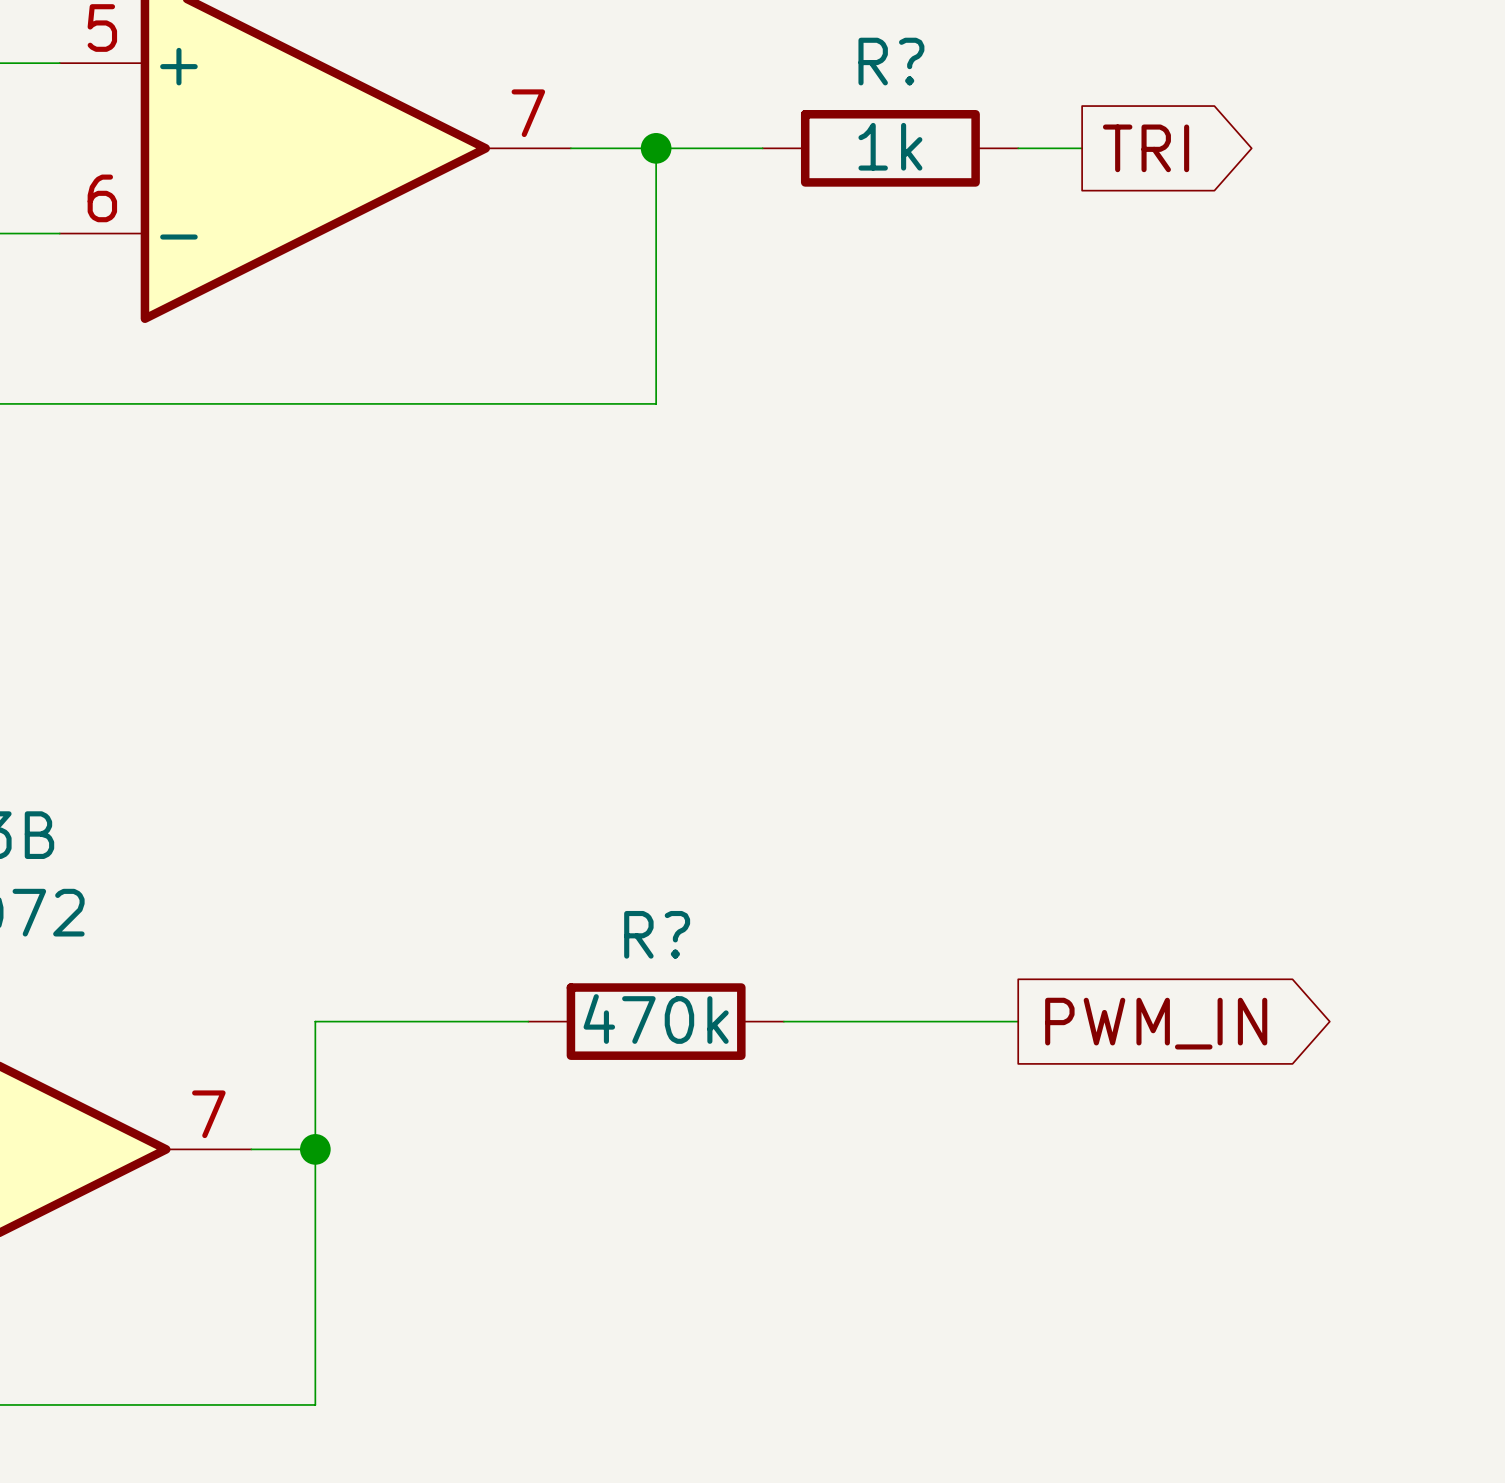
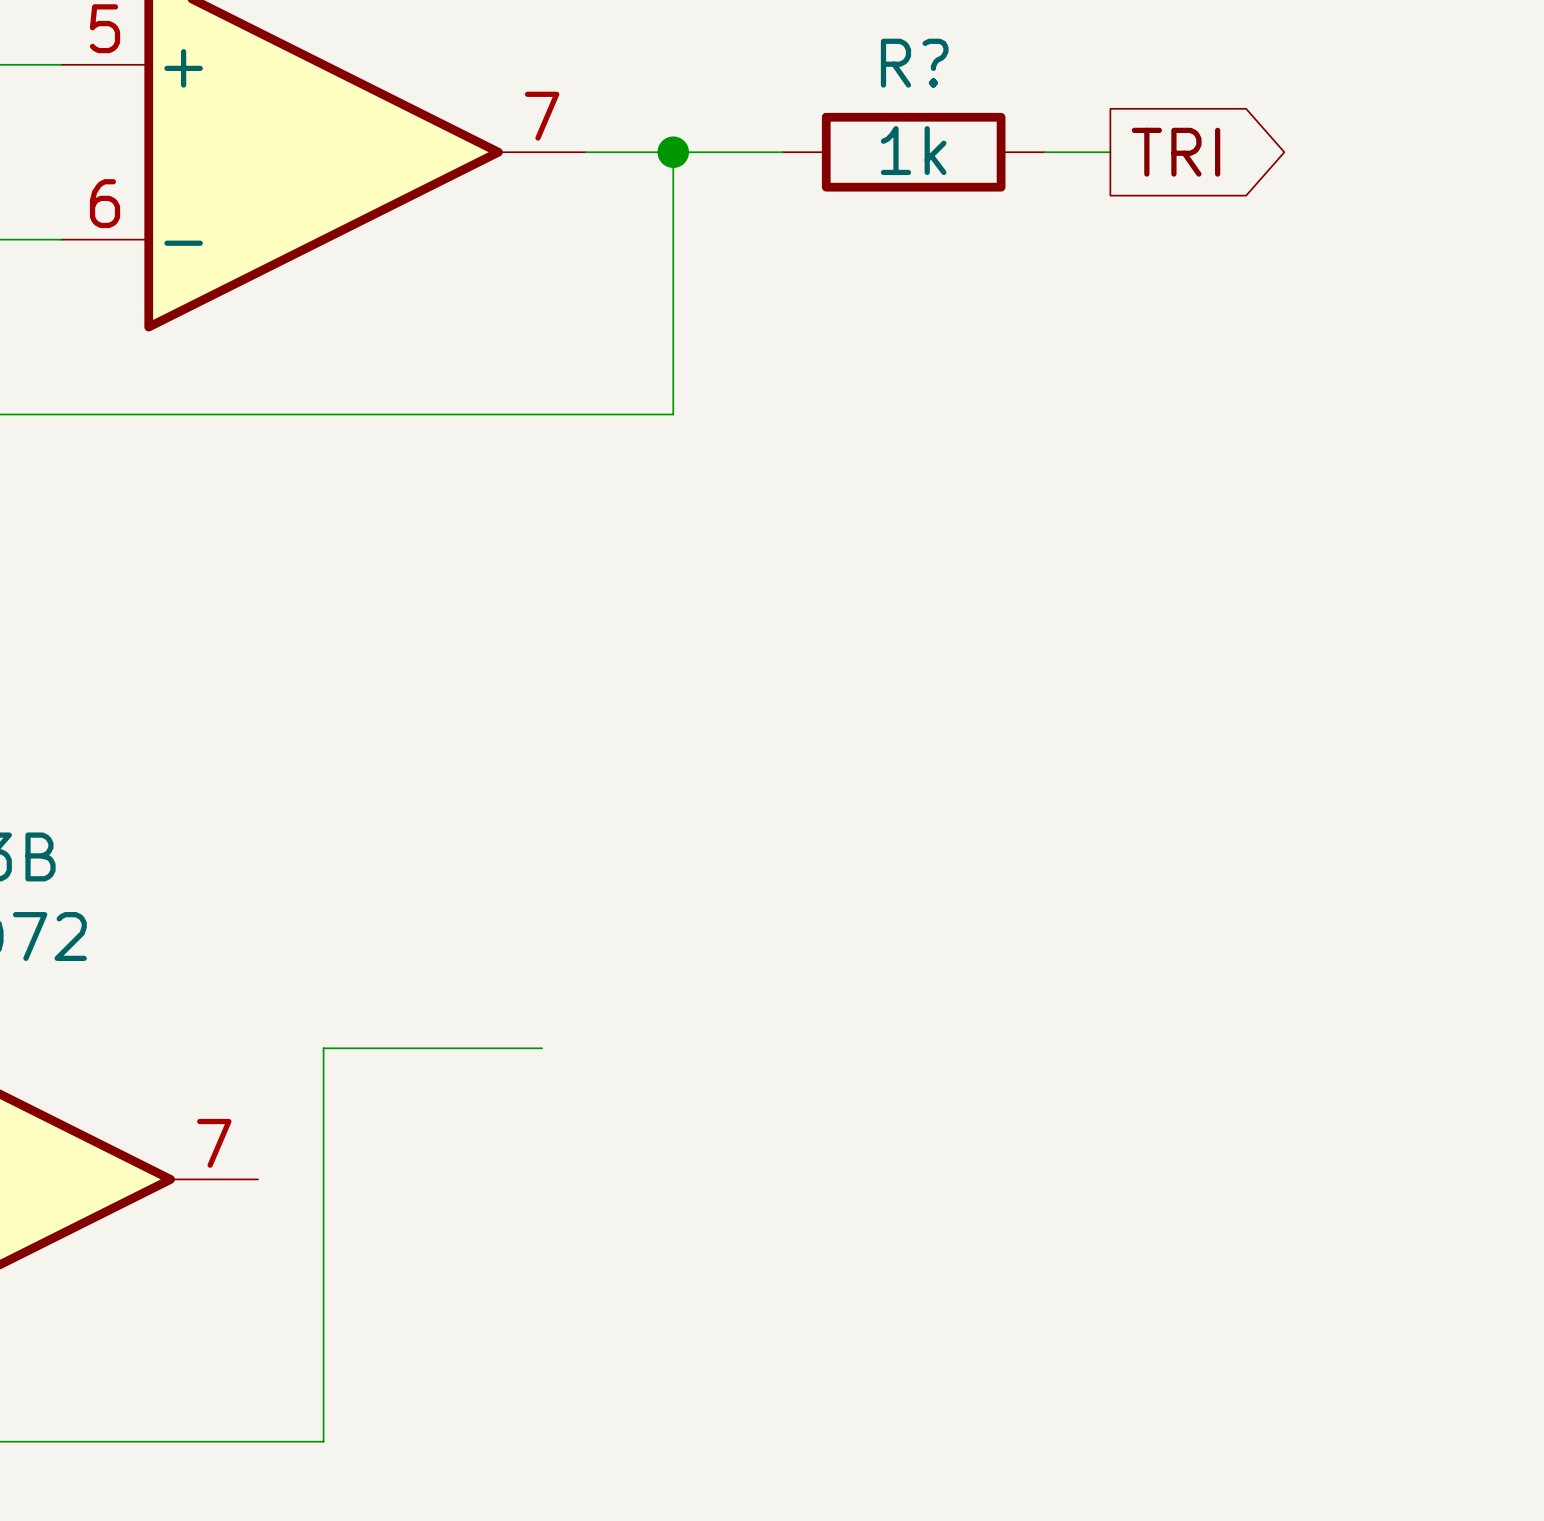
R?: 470k (656, 1021) -> none
wire: (783, 1021) (1018, 1021) -> none
global label: PWM_IN (1156, 1023) -> none
wire: (251, 1149) (315, 1149) -> none
junction: (315, 1149) -> none

